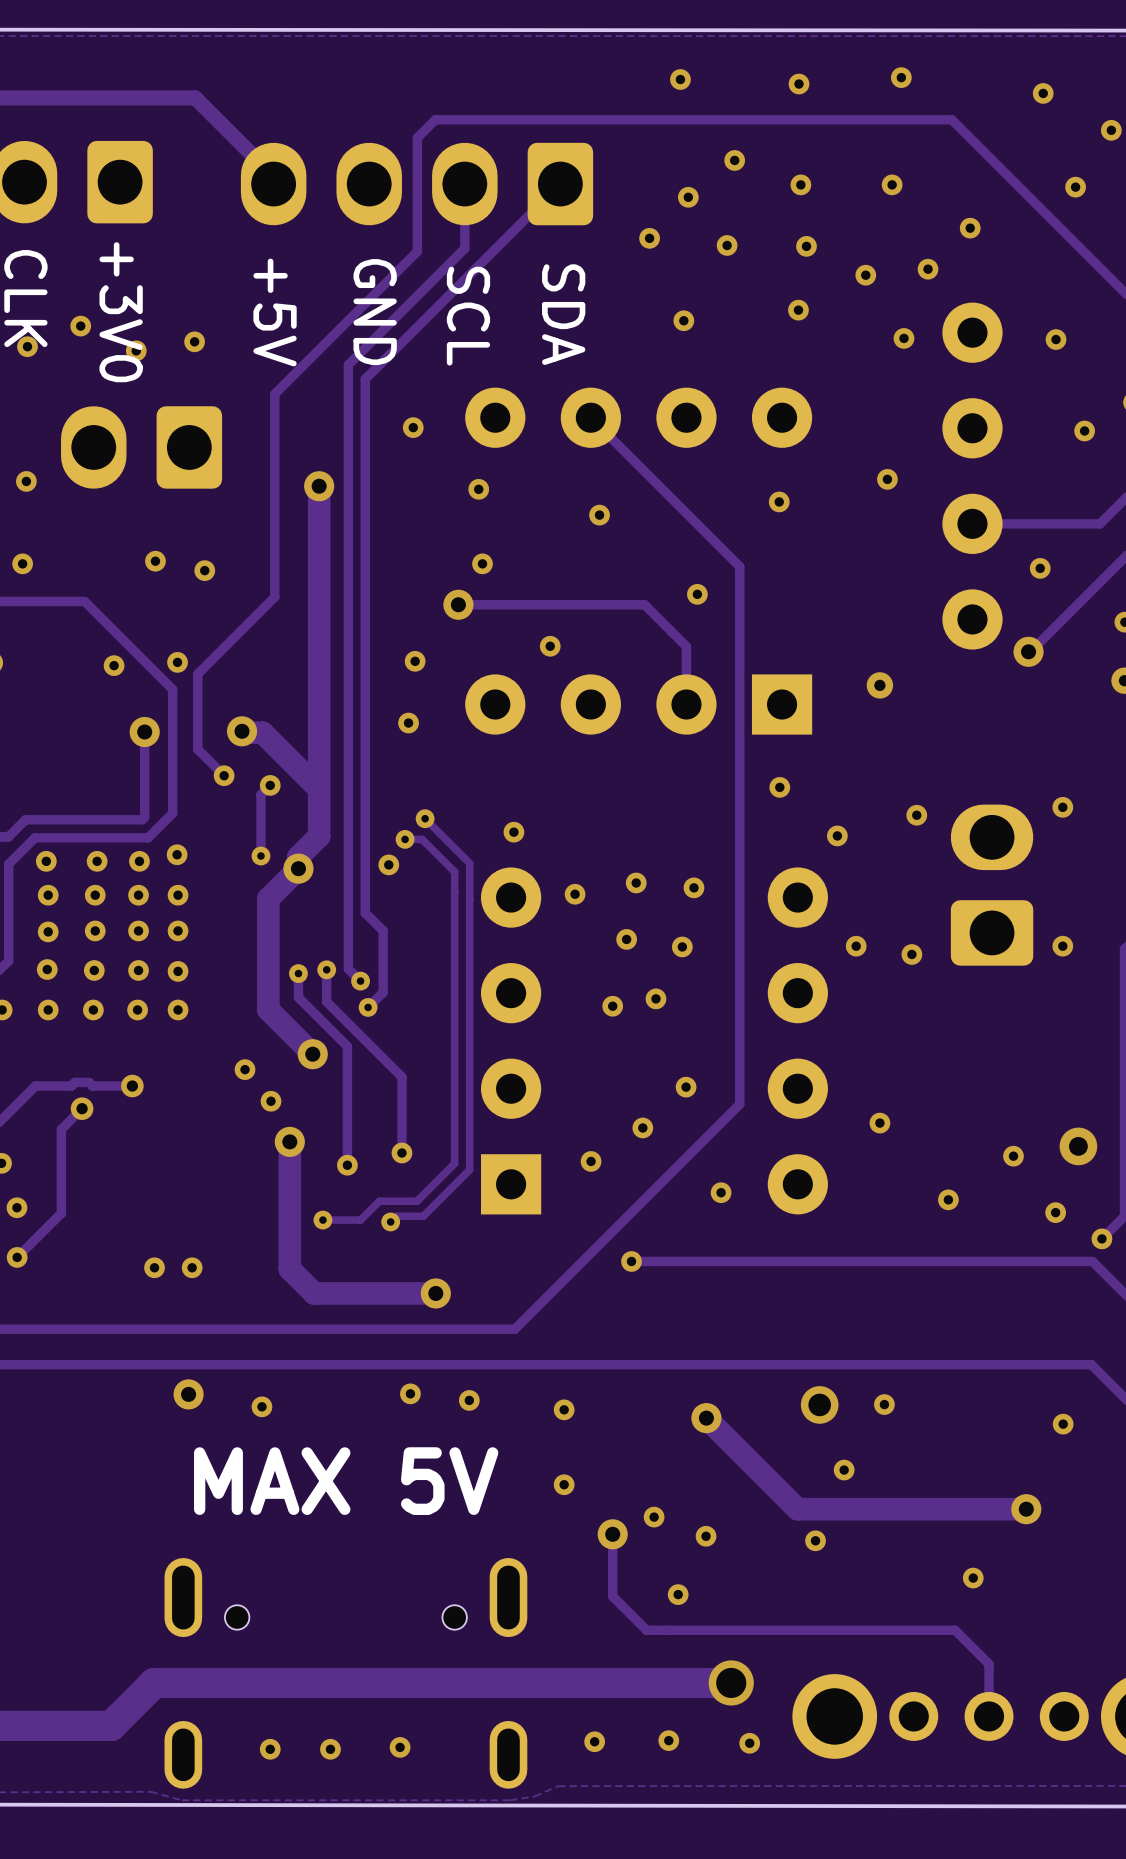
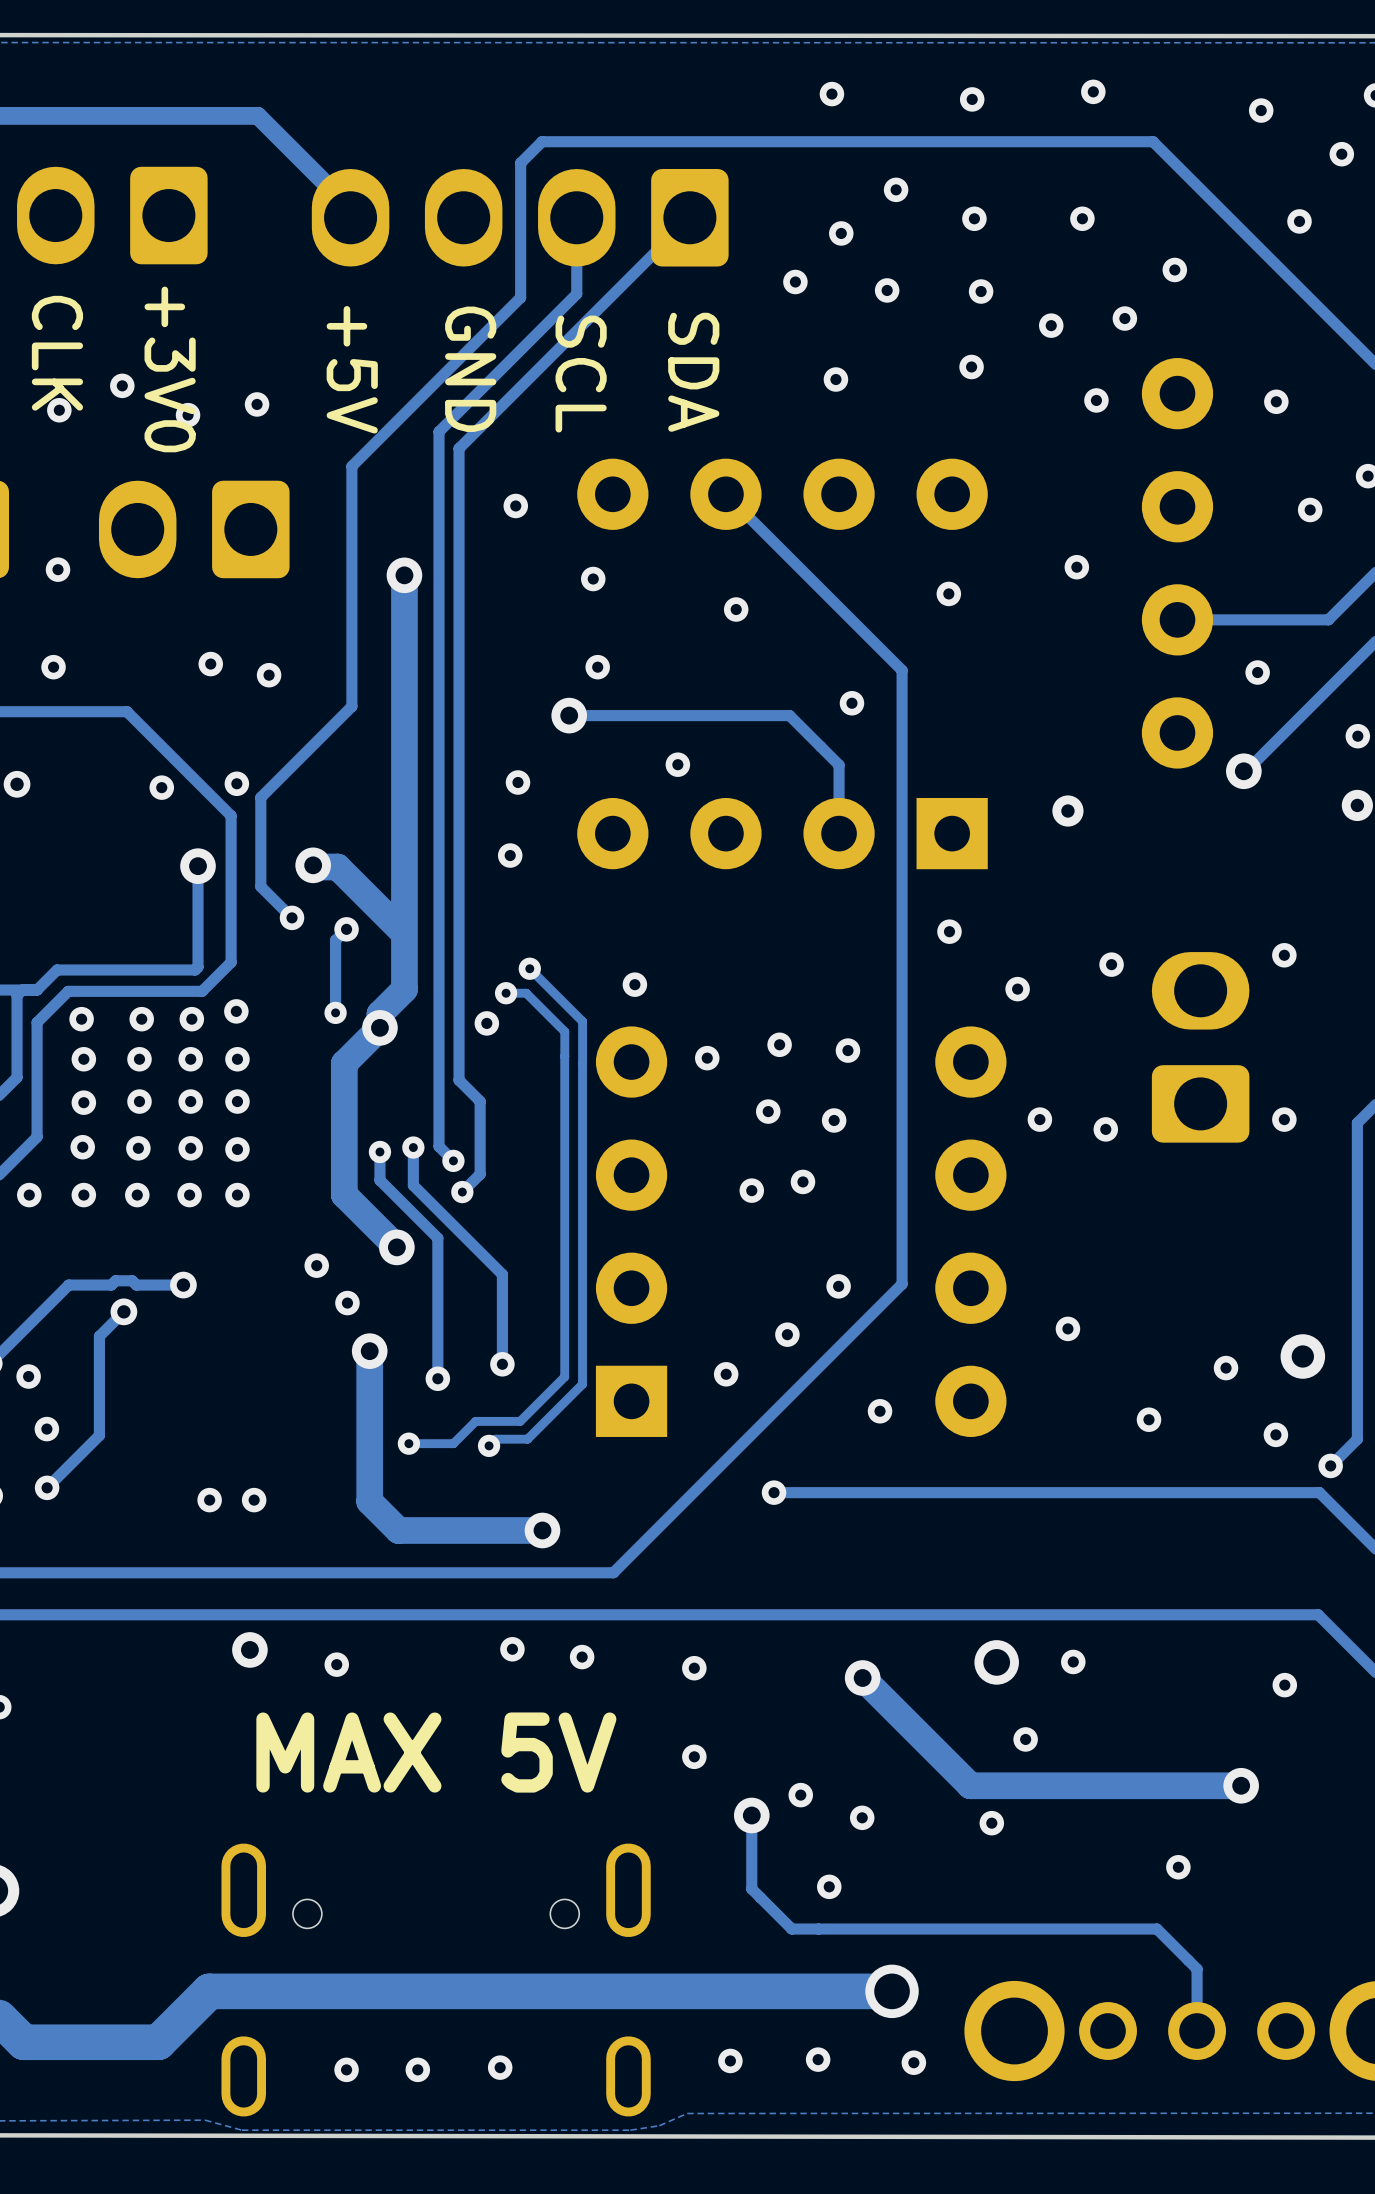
track: (739, 1085) (739, 1104) (514, 1329) (495, 1329) -> (902, 1284) (613, 1572)

